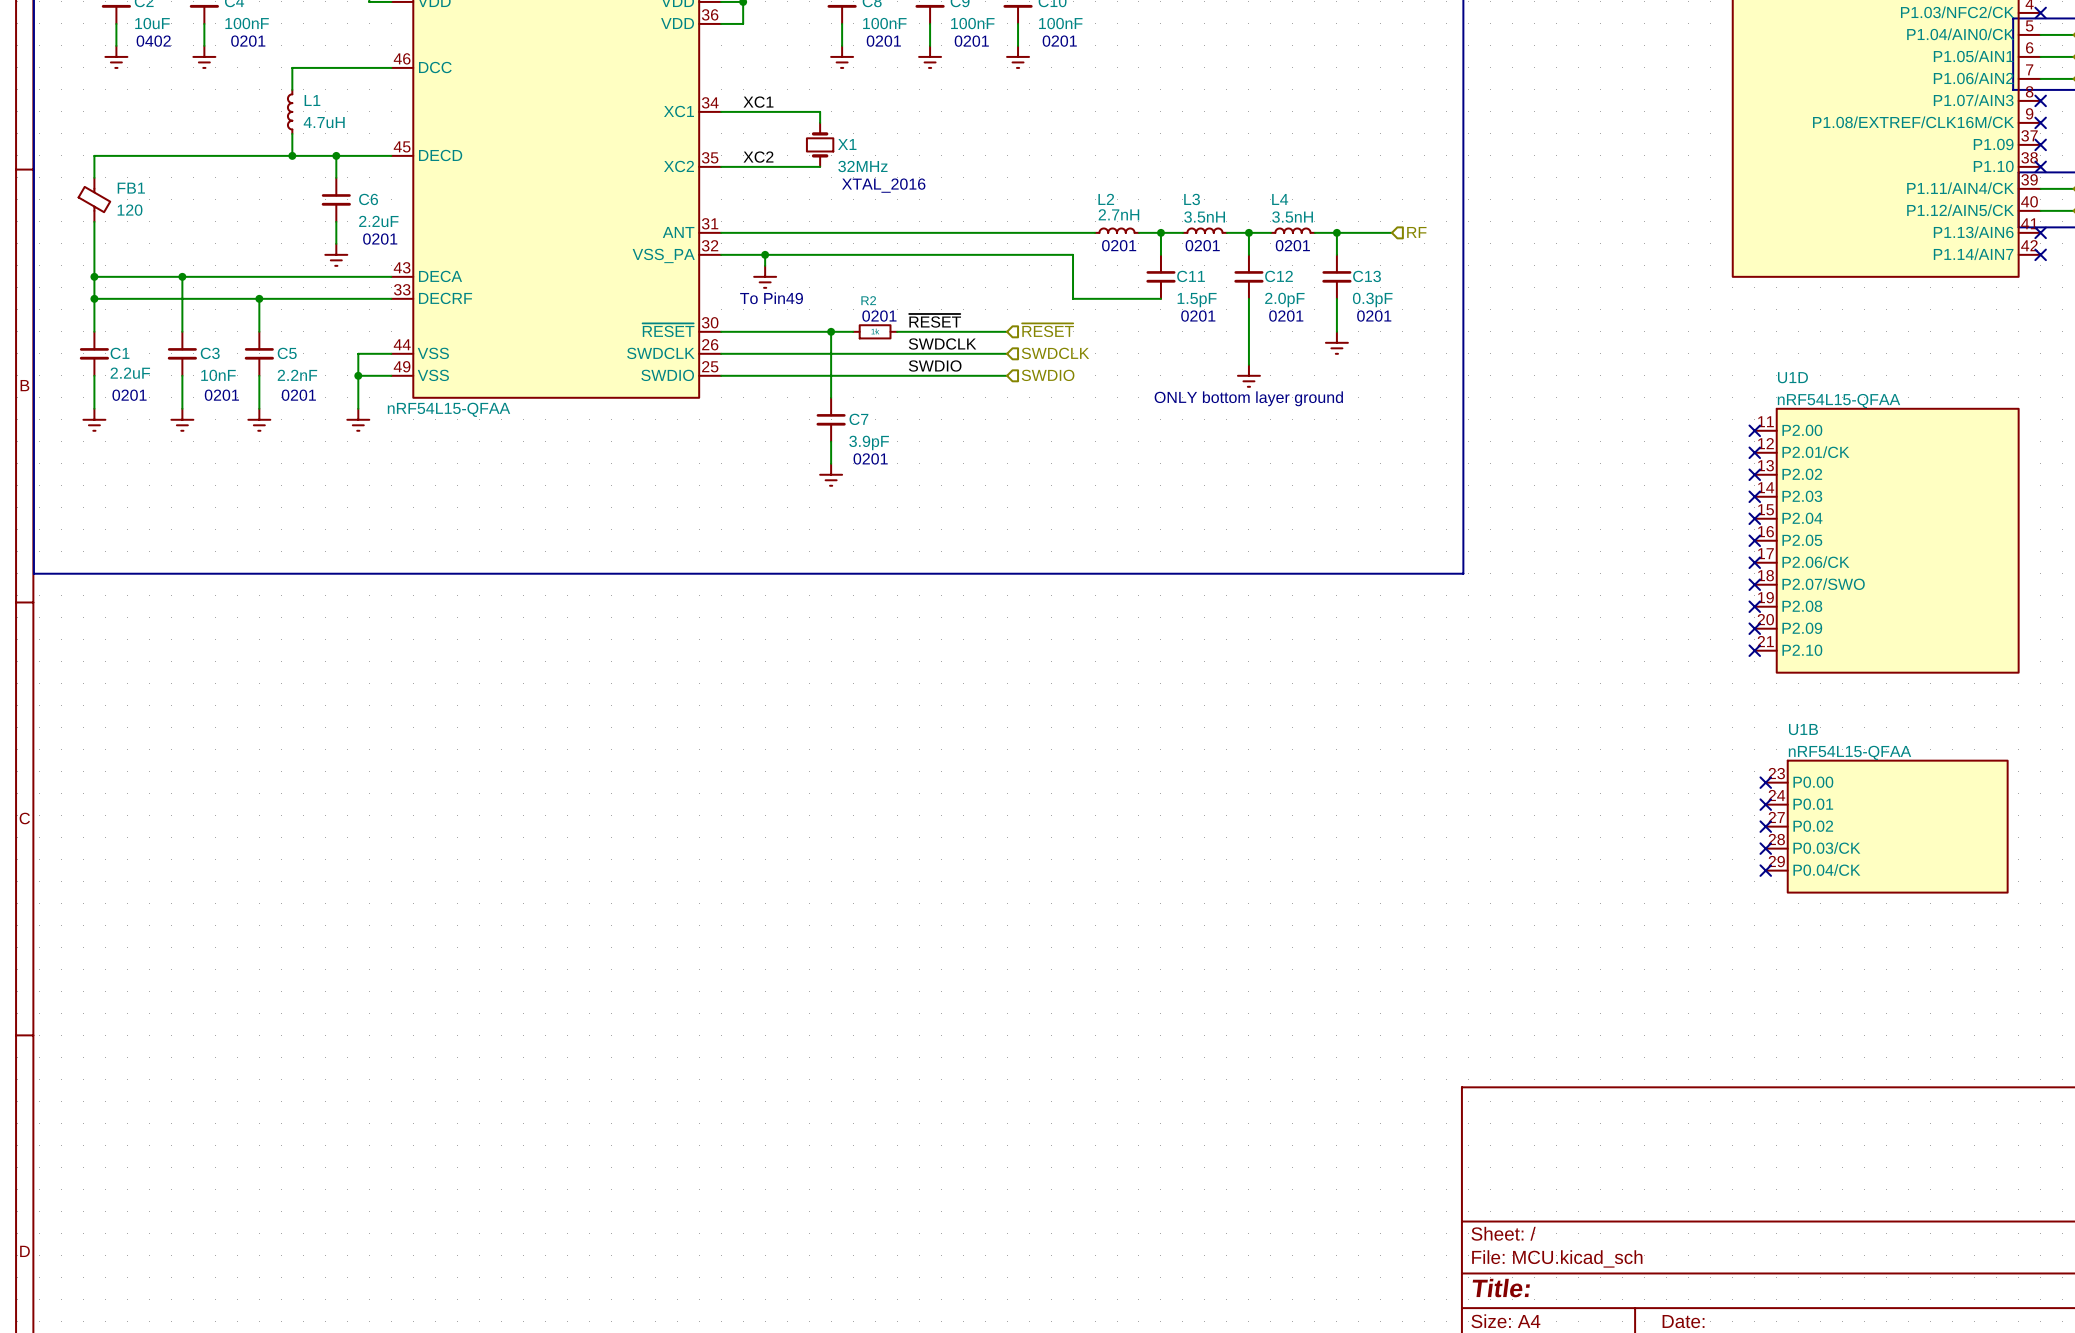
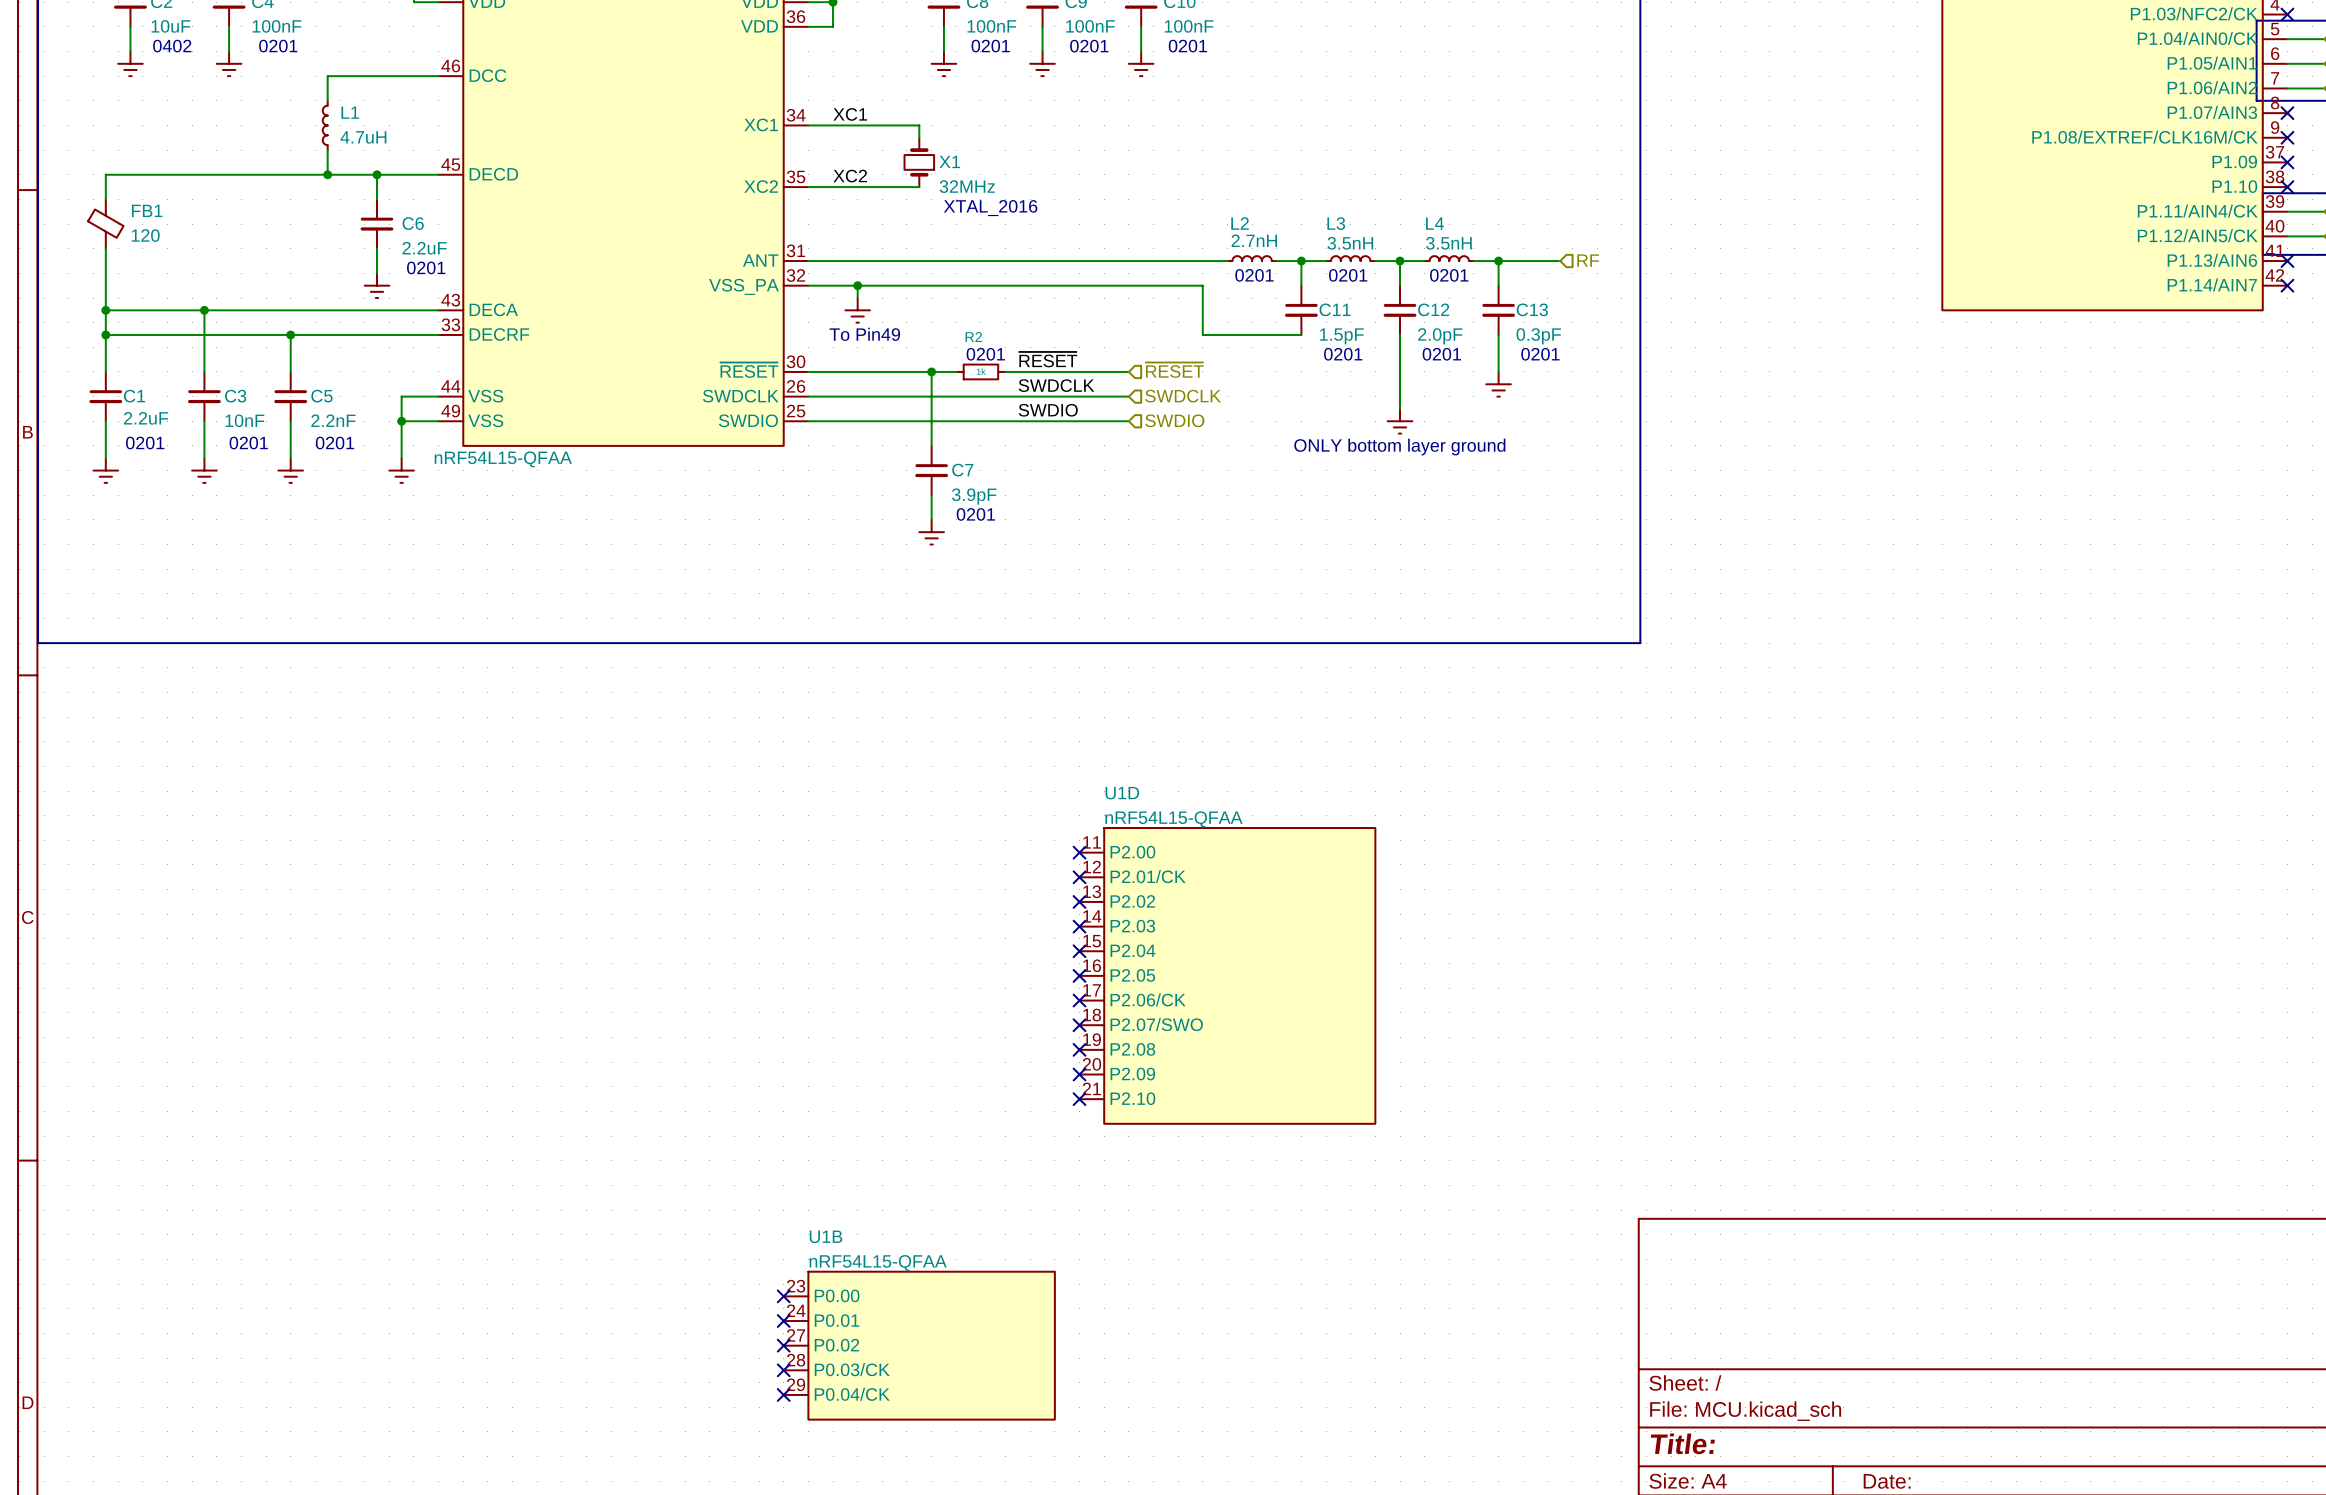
no-connect mark: (1754, 430) -> none
no-connect mark: (1754, 452) -> none
no-connect mark: (1754, 474) -> none
no-connect mark: (1754, 496) -> none
no-connect mark: (1754, 518) -> none
no-connect mark: (1754, 540) -> none
U1D position: (1886, 540) -> (1227, 975)
no-connect mark: (1754, 562) -> none
no-connect mark: (1754, 584) -> none
no-connect mark: (1754, 606) -> none
no-connect mark: (1754, 628) -> none
no-connect mark: (1754, 650) -> none
no-connect mark: none -> (1079, 852)
no-connect mark: none -> (1079, 877)
no-connect mark: (1765, 782) -> none
no-connect mark: none -> (1079, 901)
no-connect mark: (1765, 804) -> none
no-connect mark: none -> (1079, 926)
no-connect mark: (1765, 826) -> none
U1B position: (1886, 826) -> (919, 1345)
no-connect mark: none -> (1079, 951)
no-connect mark: (1765, 848) -> none
no-connect mark: none -> (1079, 975)
no-connect mark: (1765, 870) -> none
no-connect mark: none -> (1079, 1000)
no-connect mark: none -> (1079, 1025)
no-connect mark: none -> (1079, 1049)
no-connect mark: none -> (1079, 1074)
no-connect mark: none -> (1079, 1099)
no-connect mark: none -> (783, 1296)
no-connect mark: none -> (783, 1321)
no-connect mark: none -> (783, 1345)
no-connect mark: none -> (783, 1370)
no-connect mark: none -> (783, 1394)

